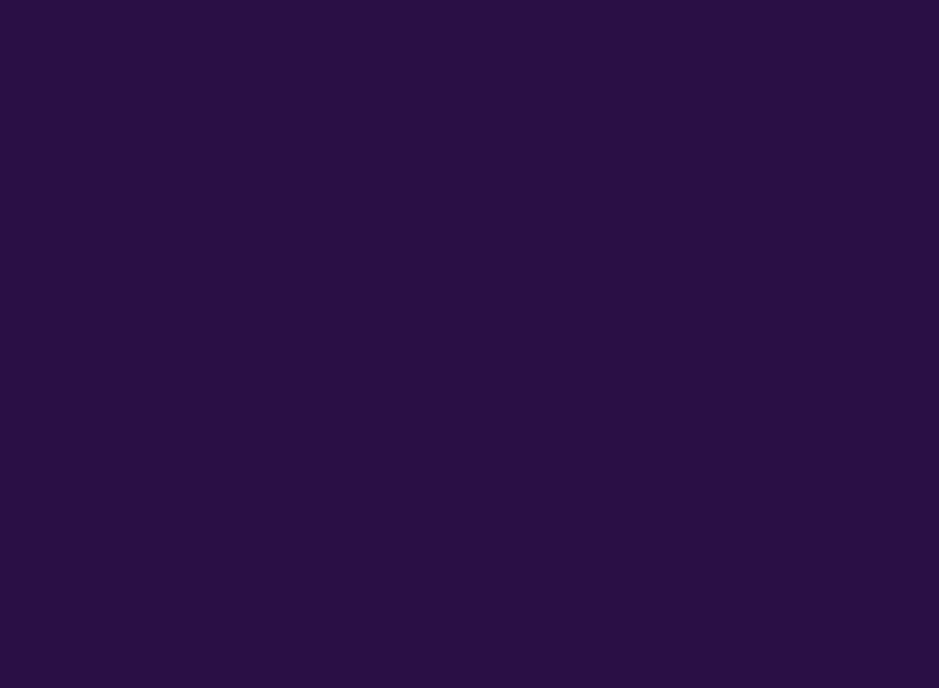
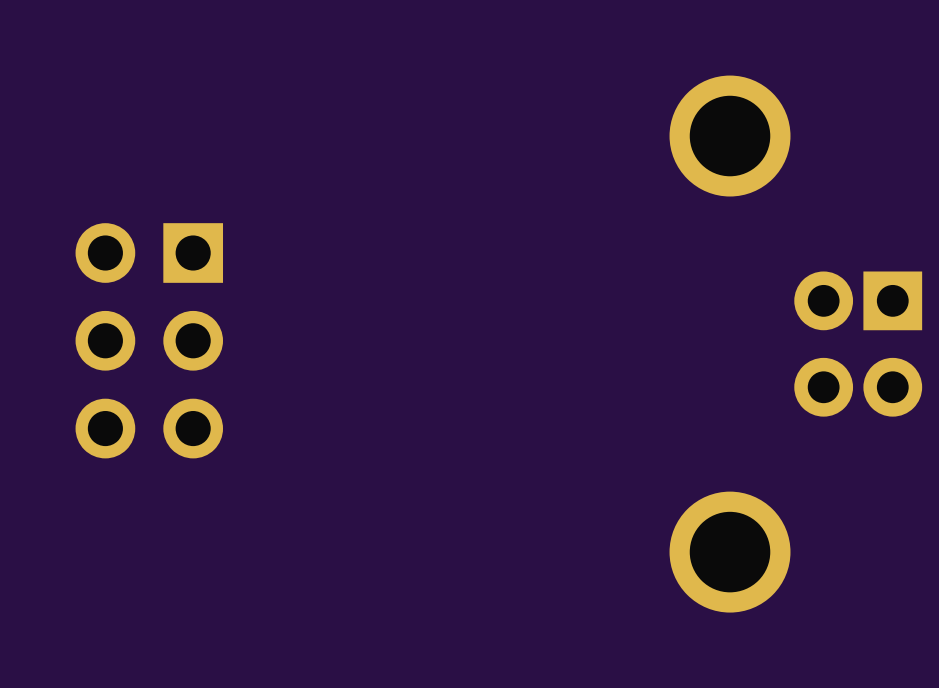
part: none -> (149, 340)
part: none -> (795, 344)

